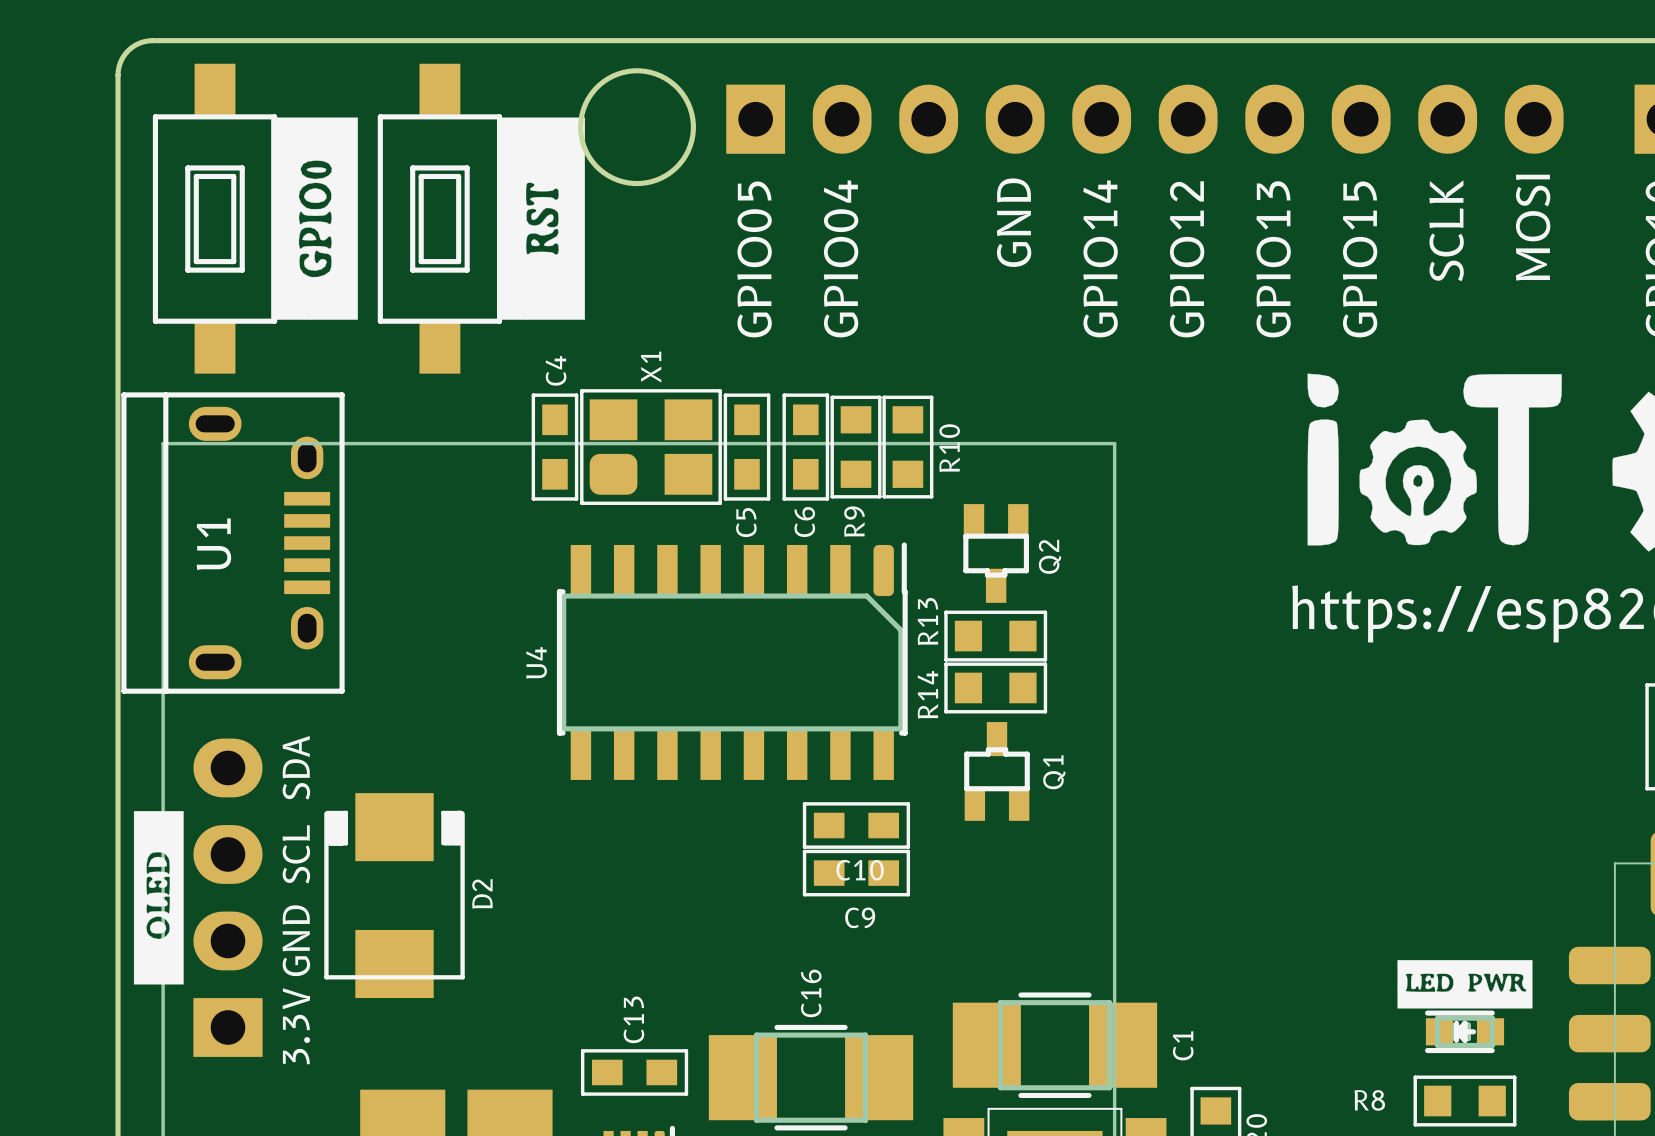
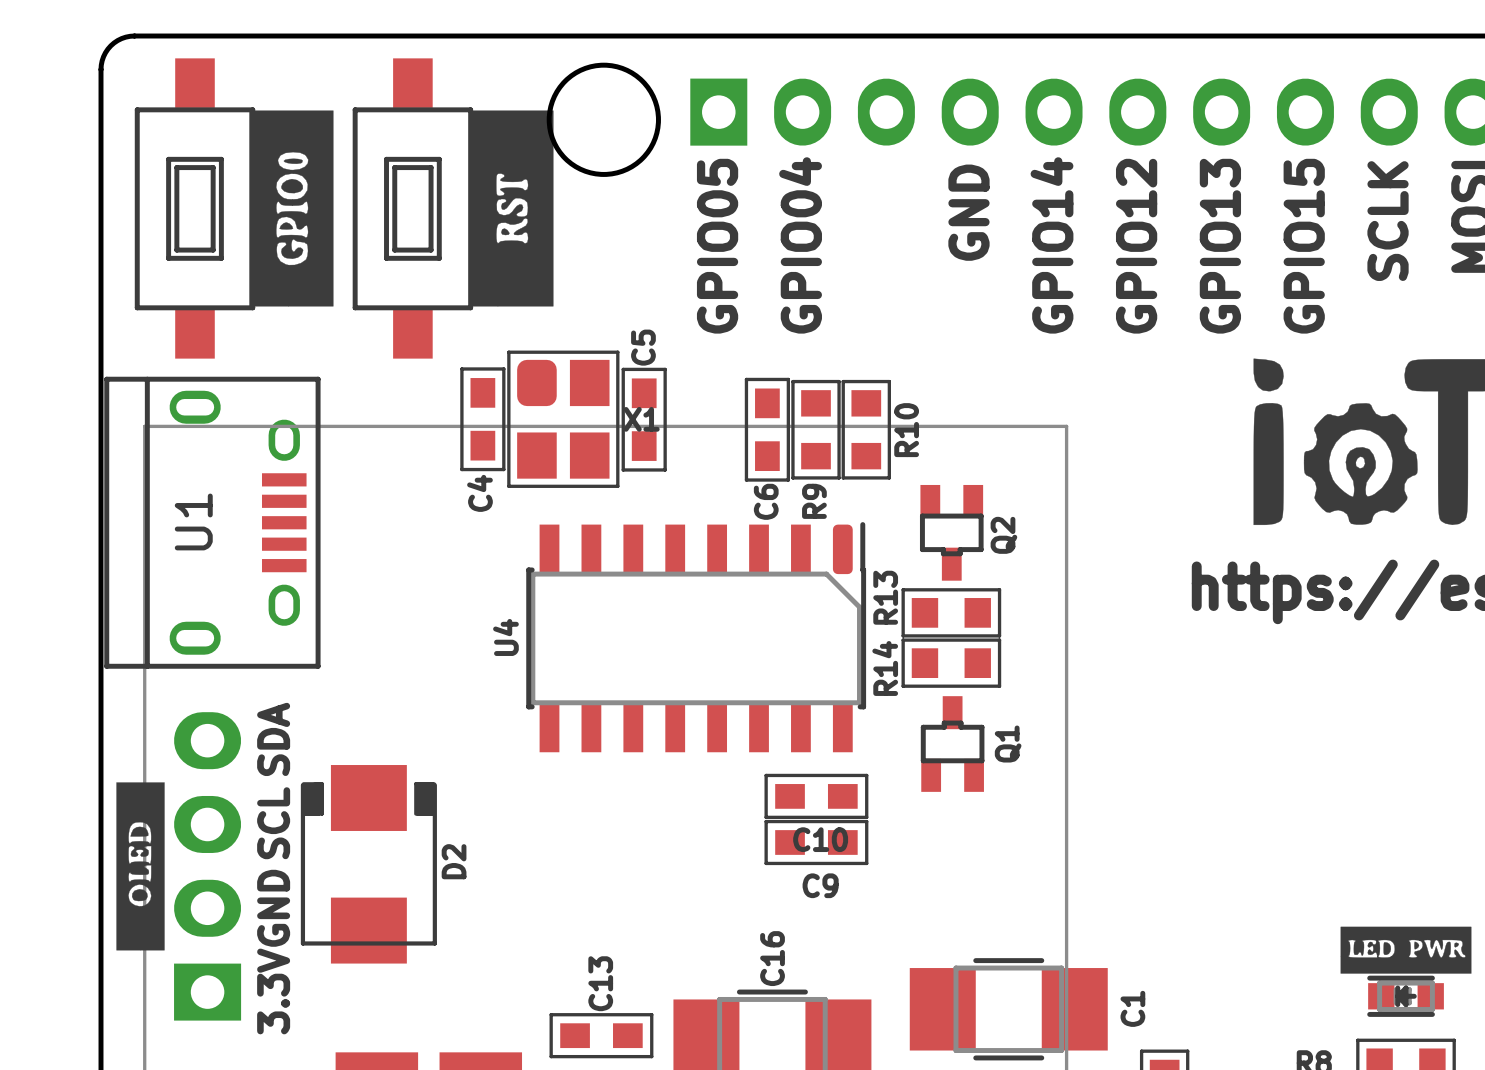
C4 name position: C4 (556, 370) -> C4 (479, 493)
C4 position: (554, 447) -> (482, 419)
X1 rotation: 0° (650, 447) -> 90° clockwise (563, 419)
C5 position: (747, 447) -> (644, 419)
C5 name position: C5 (746, 522) -> C5 (643, 347)

